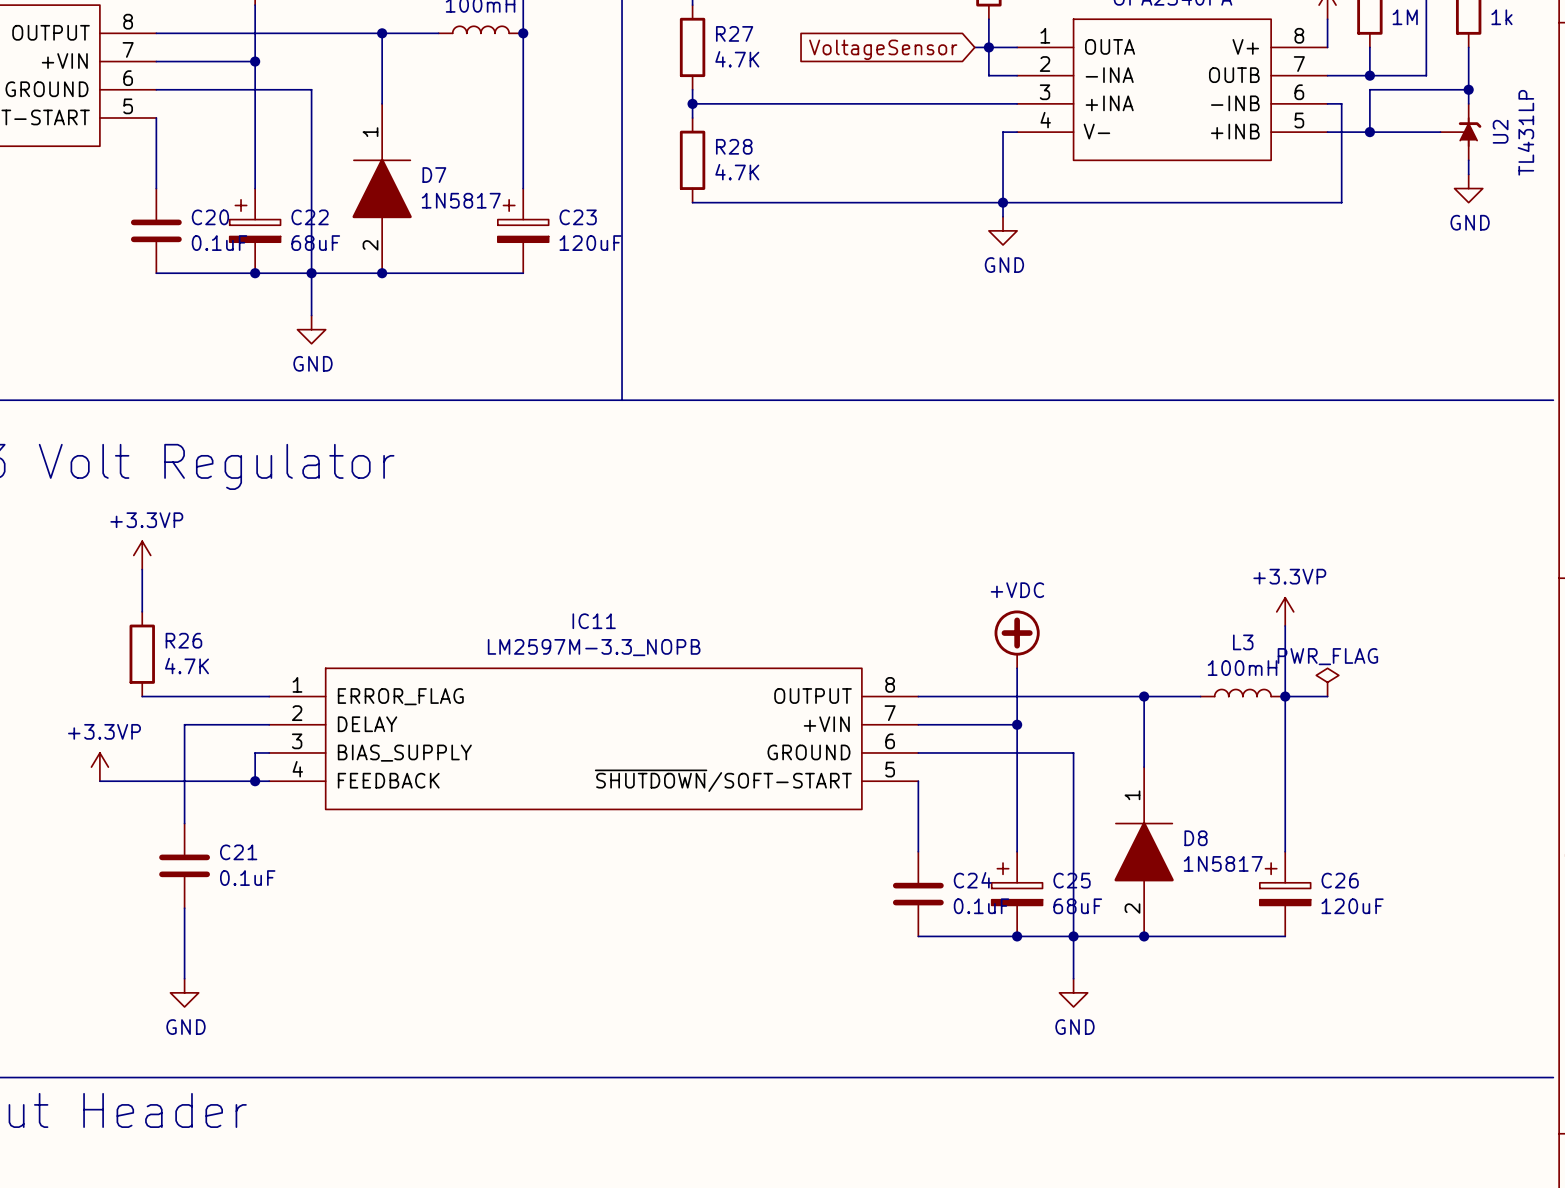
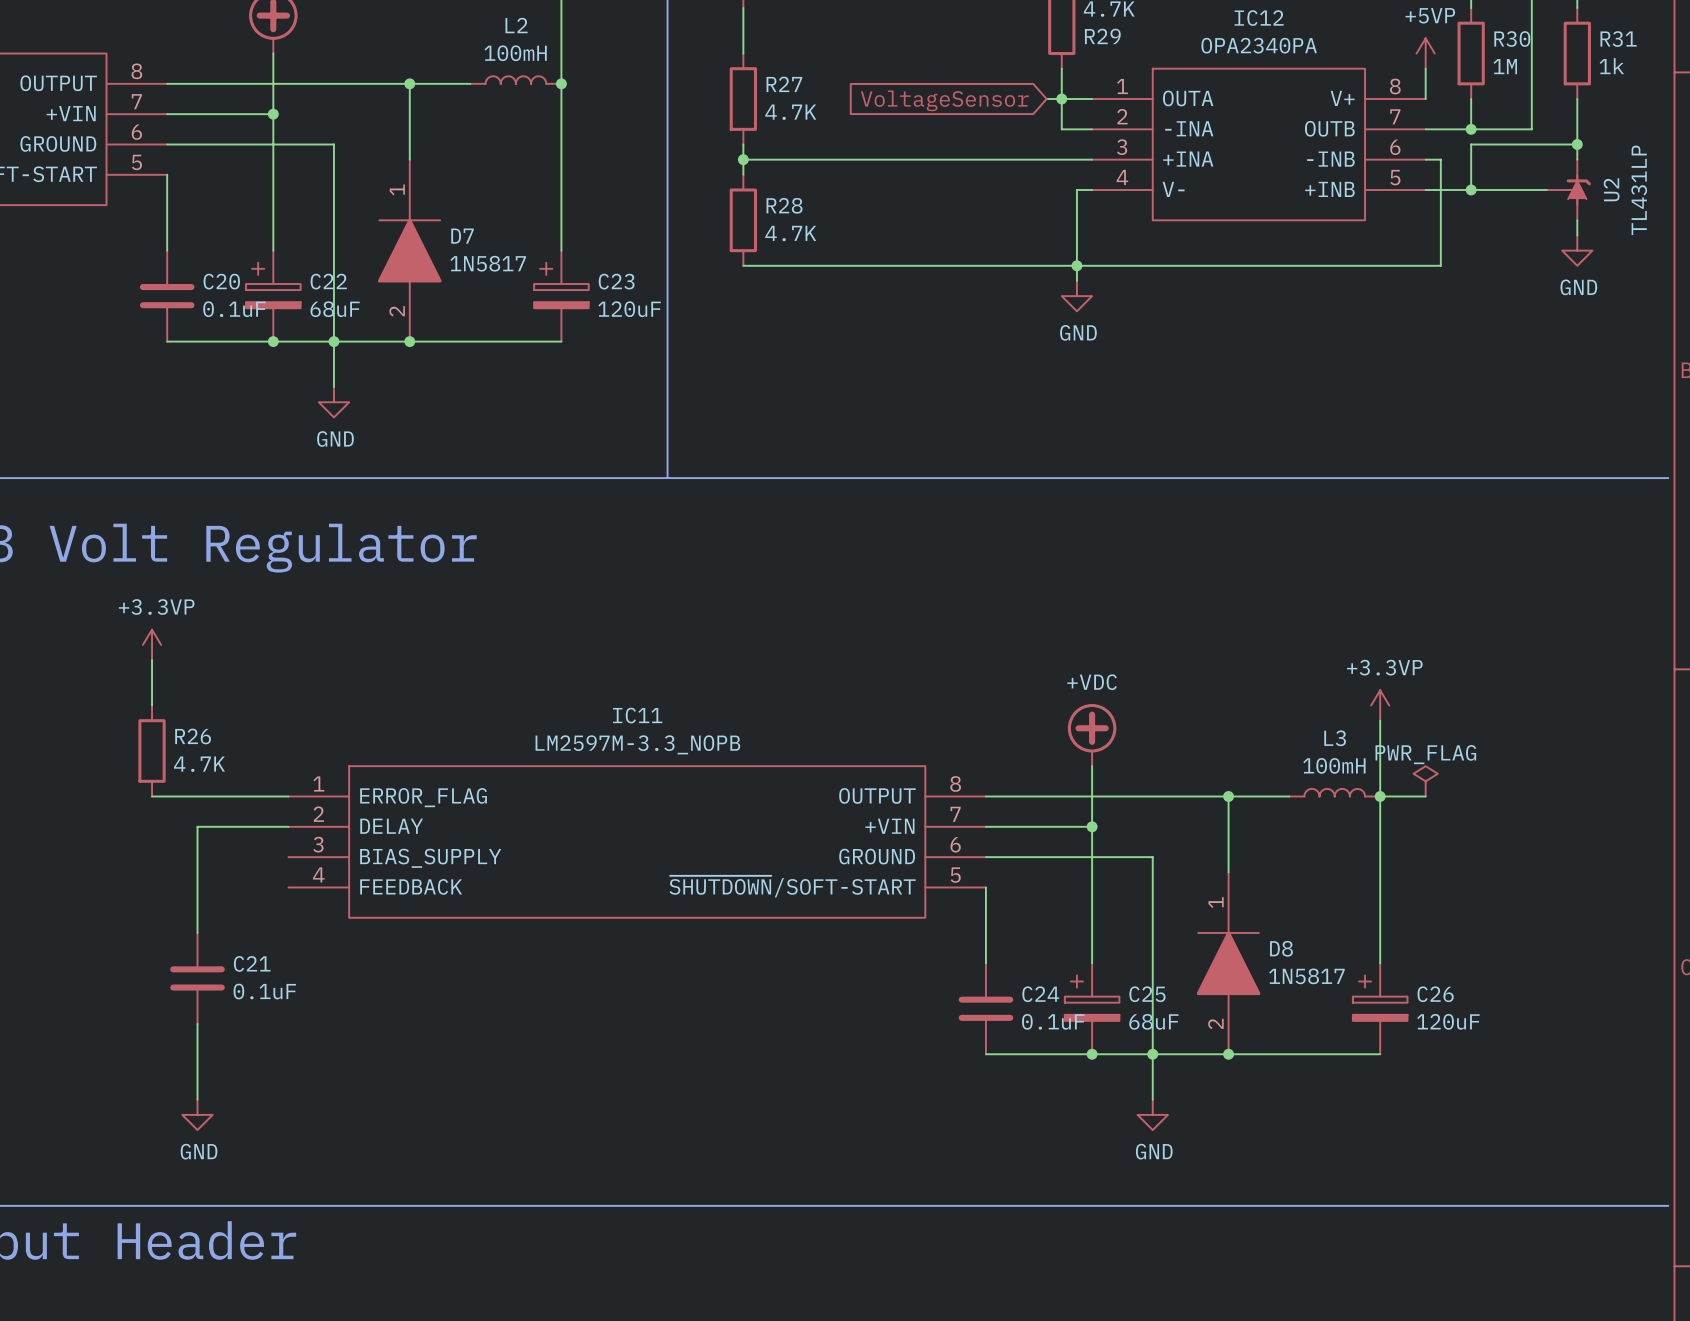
wire: (269, 752) (255, 752) (255, 781) -> none
power symbol: +3.3VP (99, 767) -> none
wire: (99, 781) (269, 781) -> none
junction: (255, 781) -> none

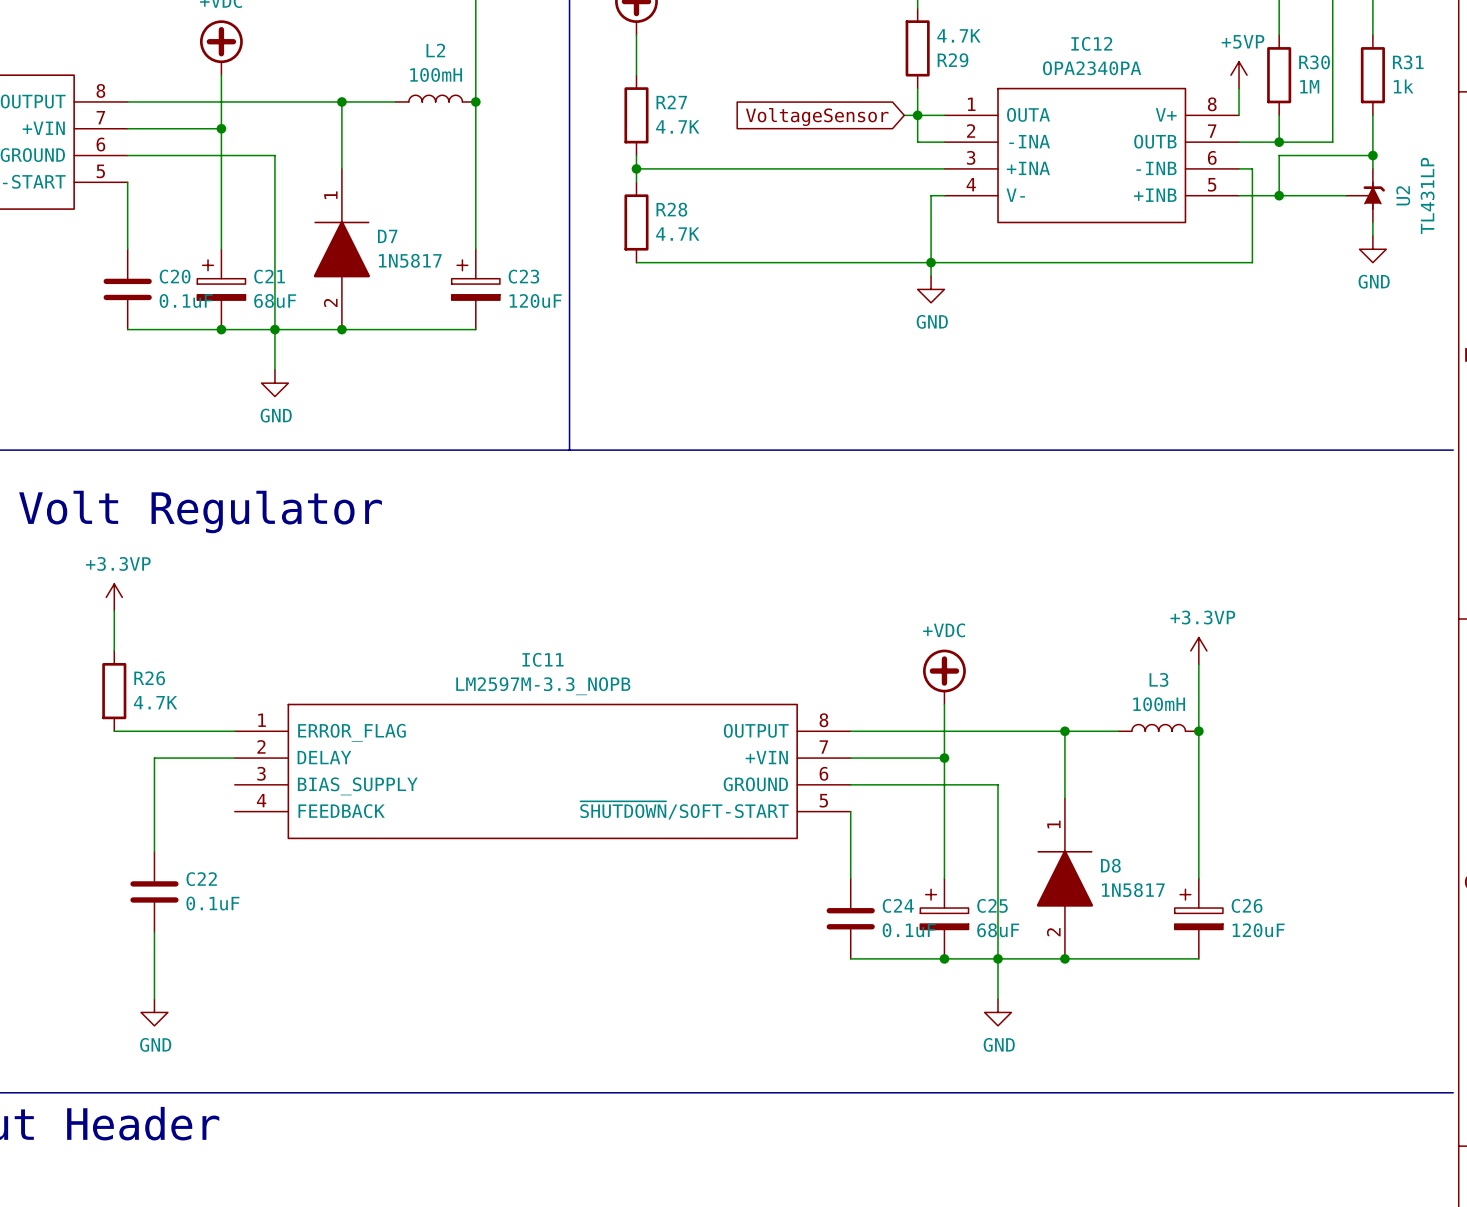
C22 name: C22 (328, 281) -> C21 (269, 276)
power symbol: PWR_FLAG (1425, 781) -> none
wire: (1380, 796) (1425, 796) -> none
C21 name: C21 (252, 963) -> C22 (201, 879)

